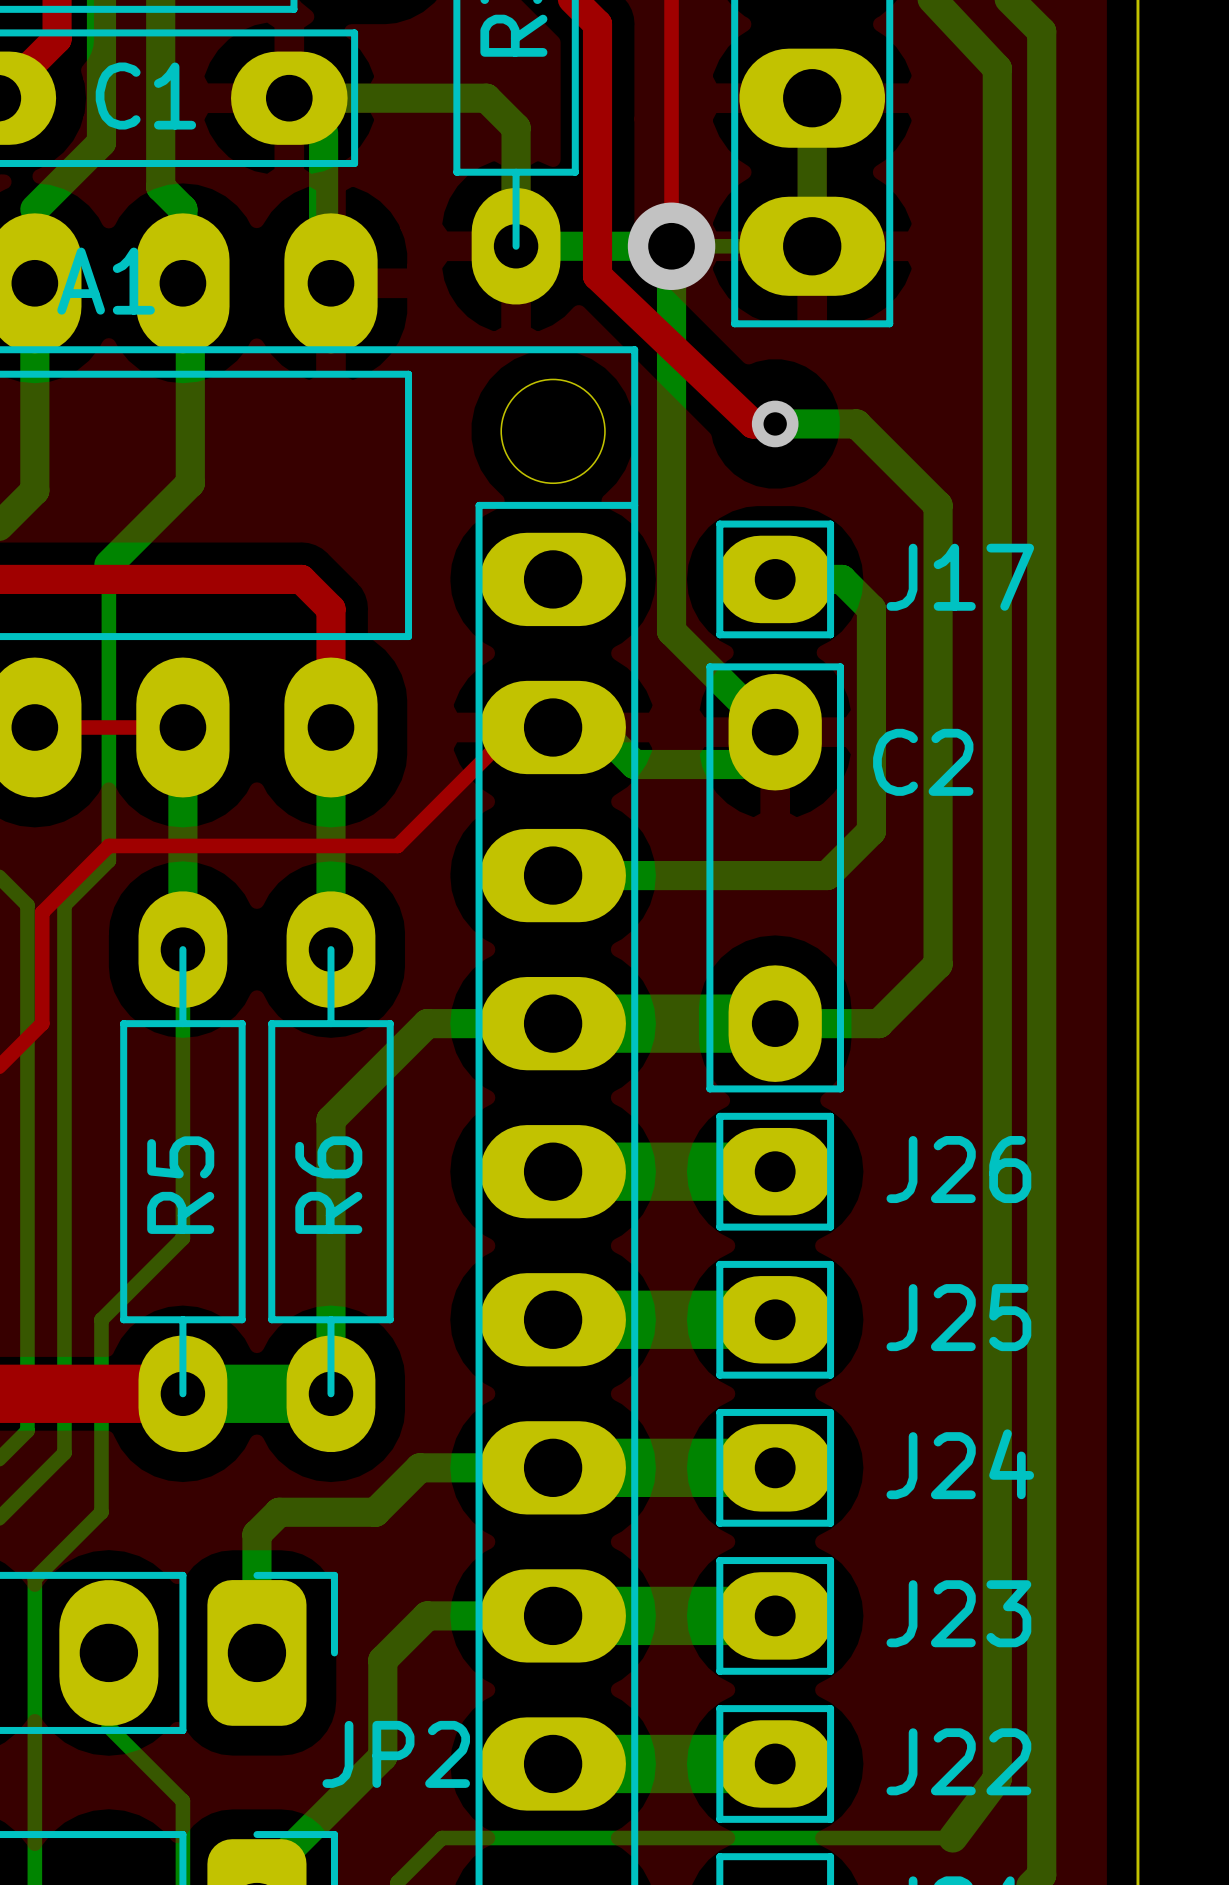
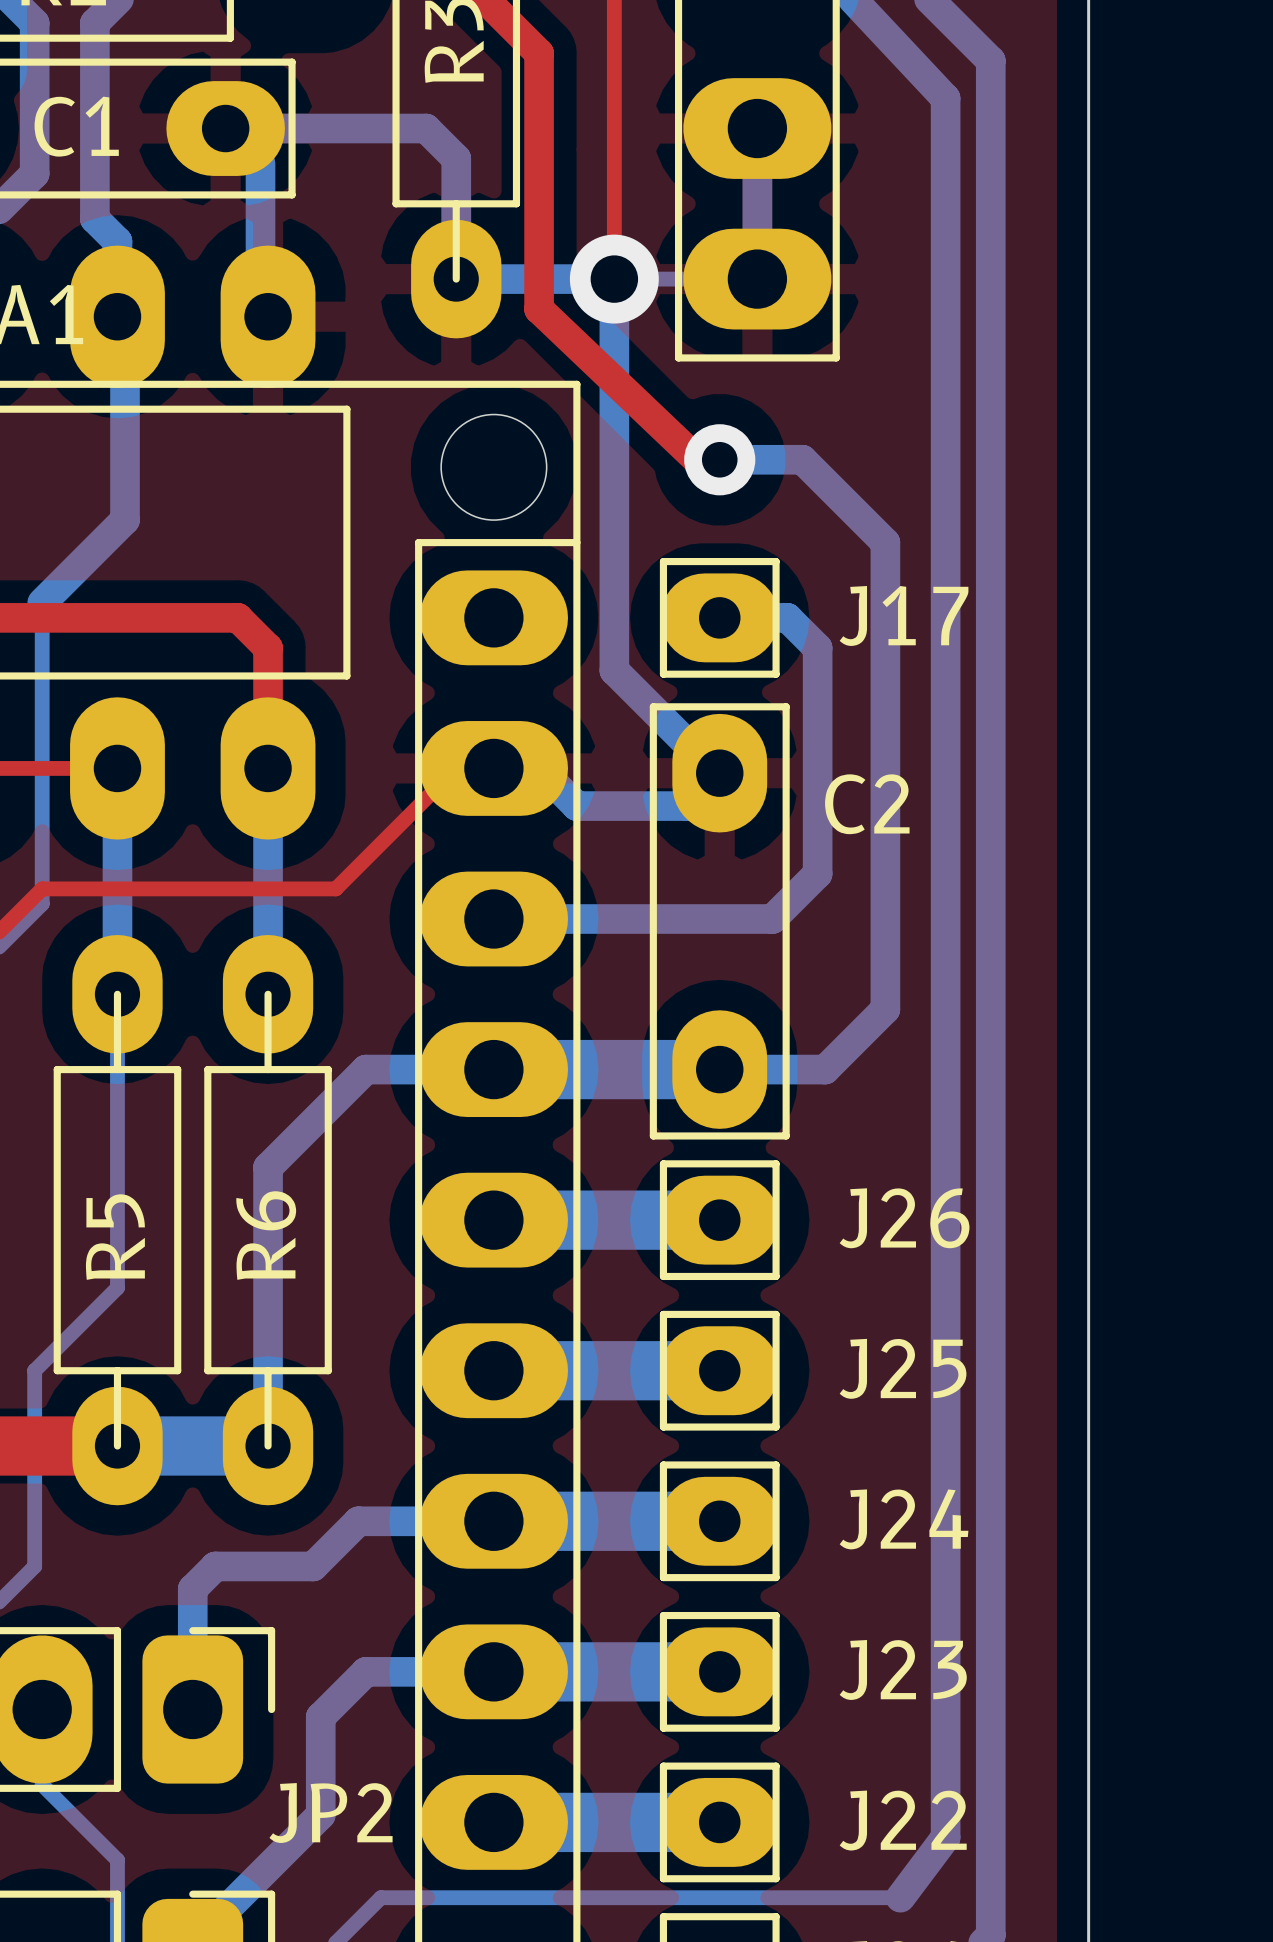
via size: [751, 400, 799, 448] -> [684, 424, 756, 496]

